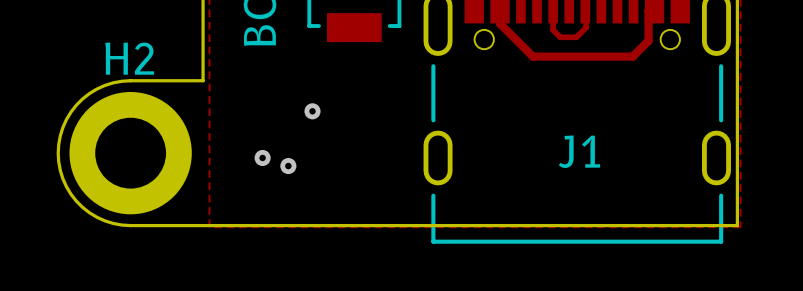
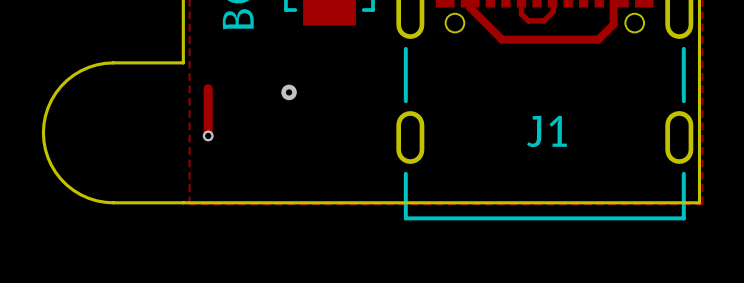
track: none -> (208, 88) (208, 135)
H2: (130, 153) -> none
via: none -> (208, 135)
via: (262, 157) -> none
via: (288, 166) -> none

